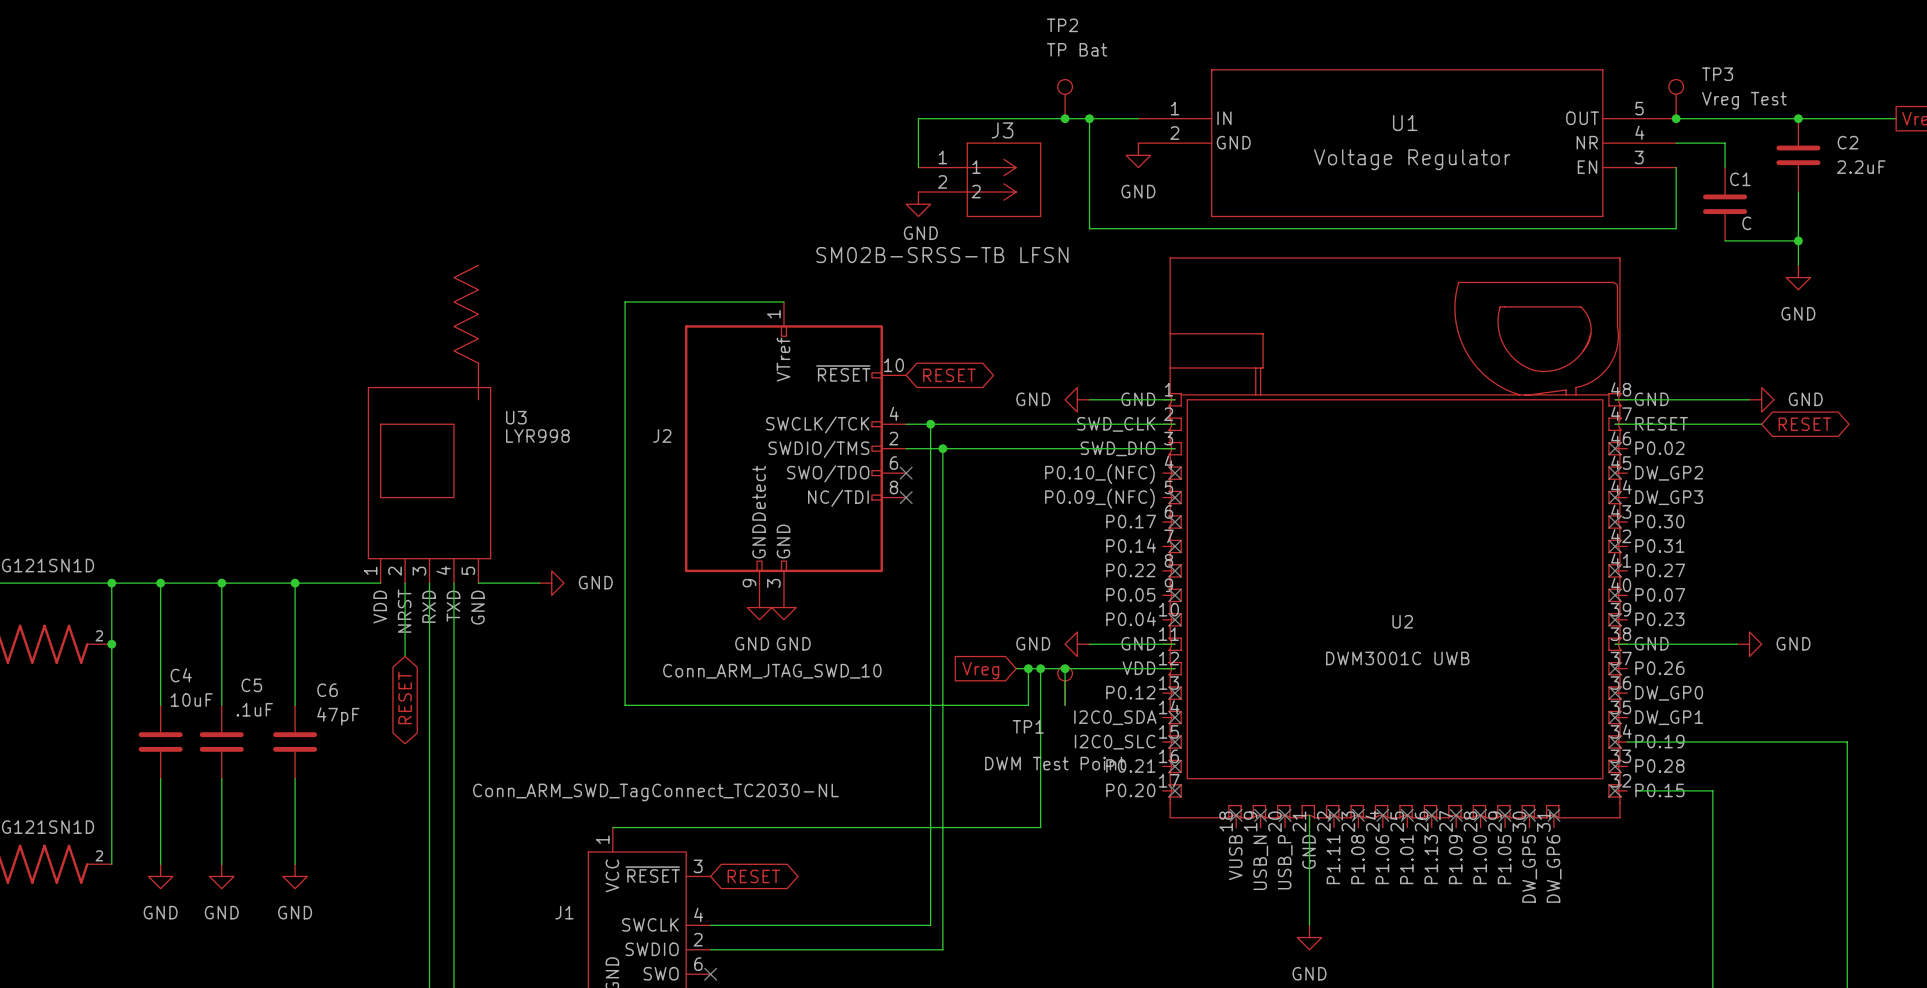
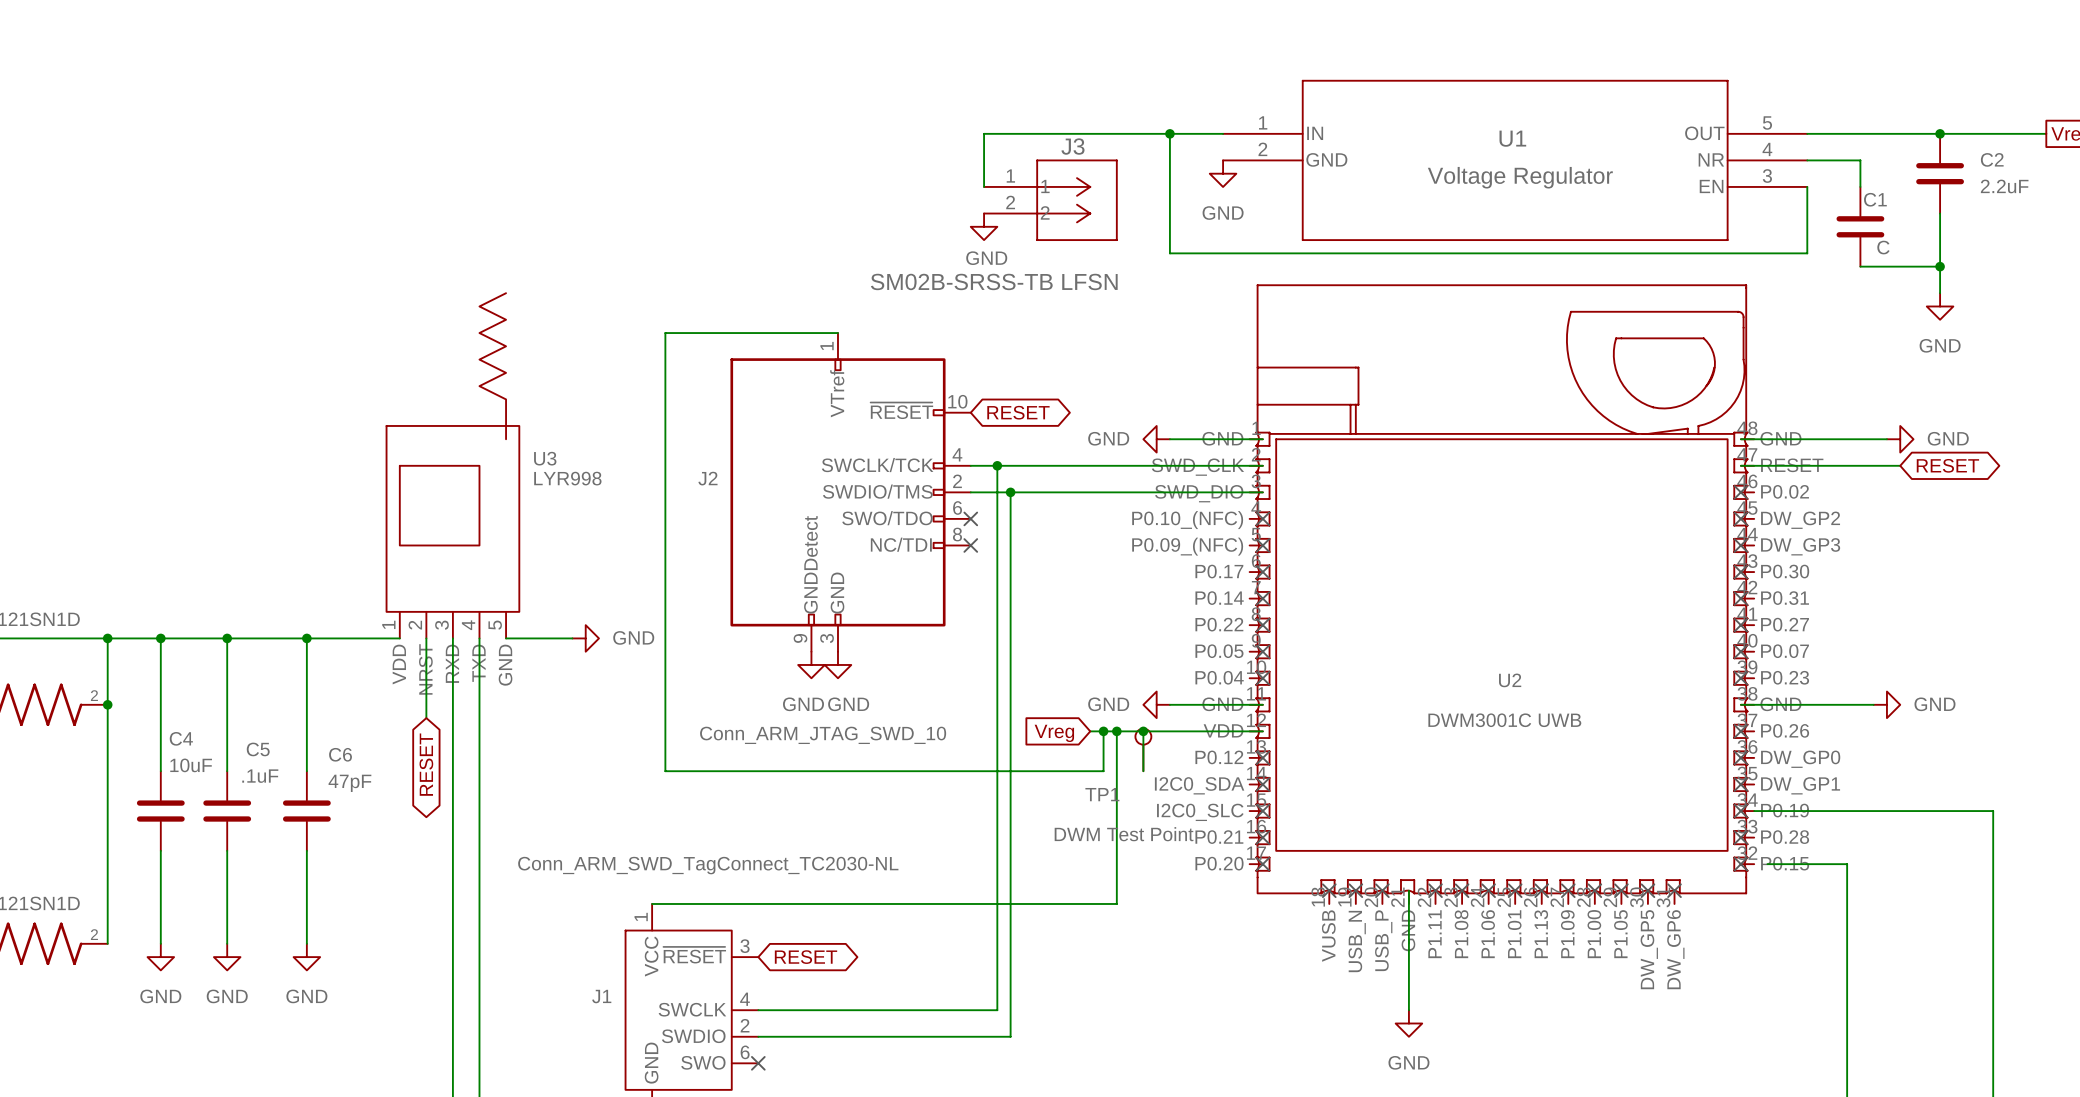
TP2: TP Bat (1065, 99) -> none
TP3: Vreg Test (1676, 99) -> none
junction: (1065, 118) -> none
junction: (1676, 118) -> none

